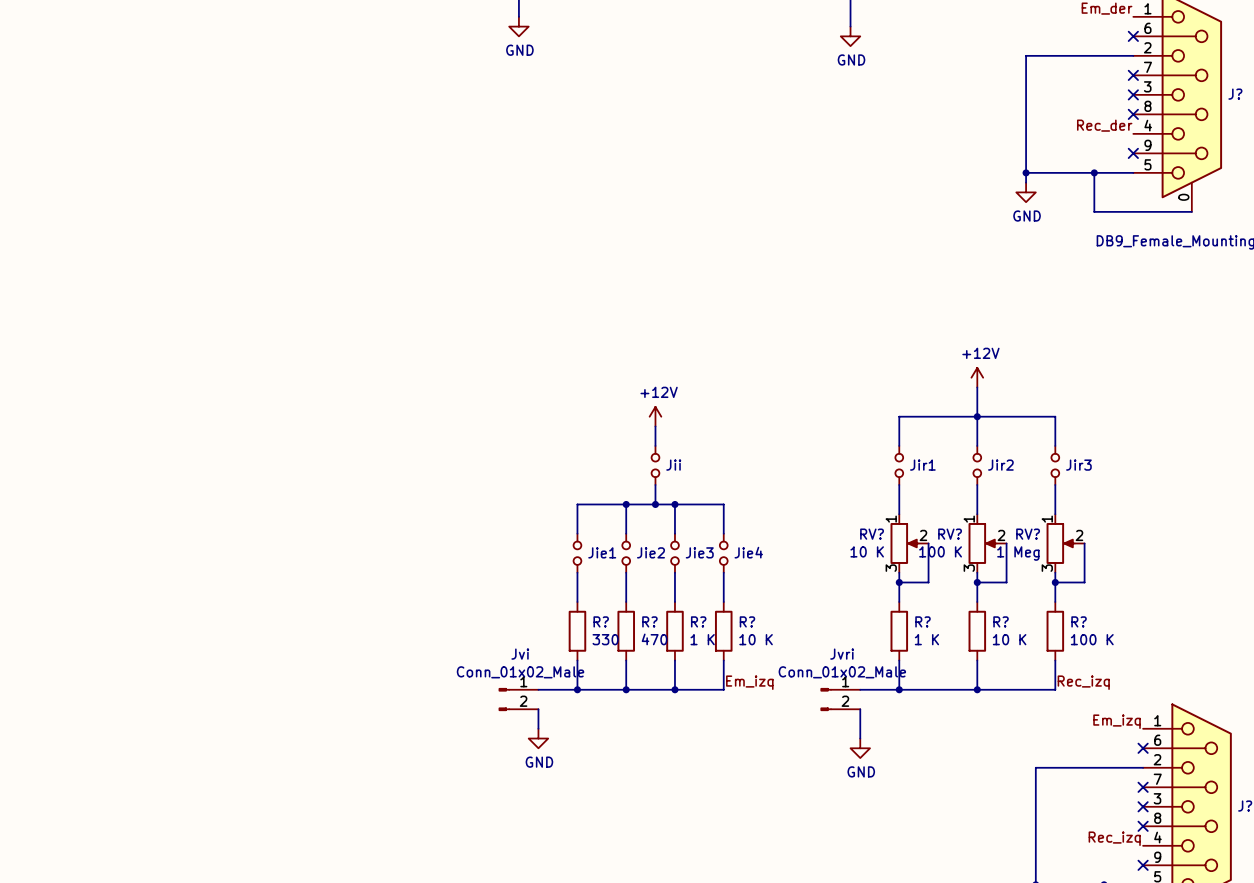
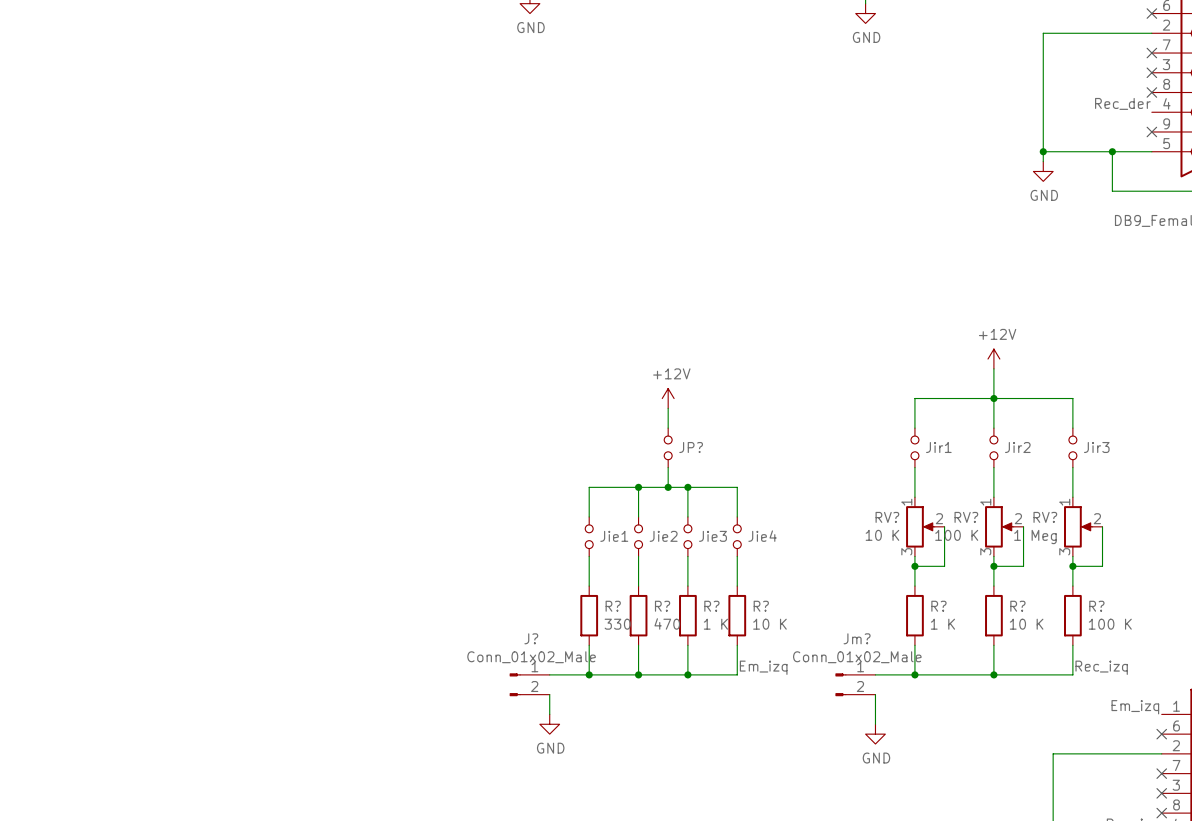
Jii name: Jii (673, 465) -> JP? (691, 447)
Jvi name: Jvi (520, 654) -> J? (531, 638)
Jvri name: Jvri (842, 654) -> Jm? (857, 638)

